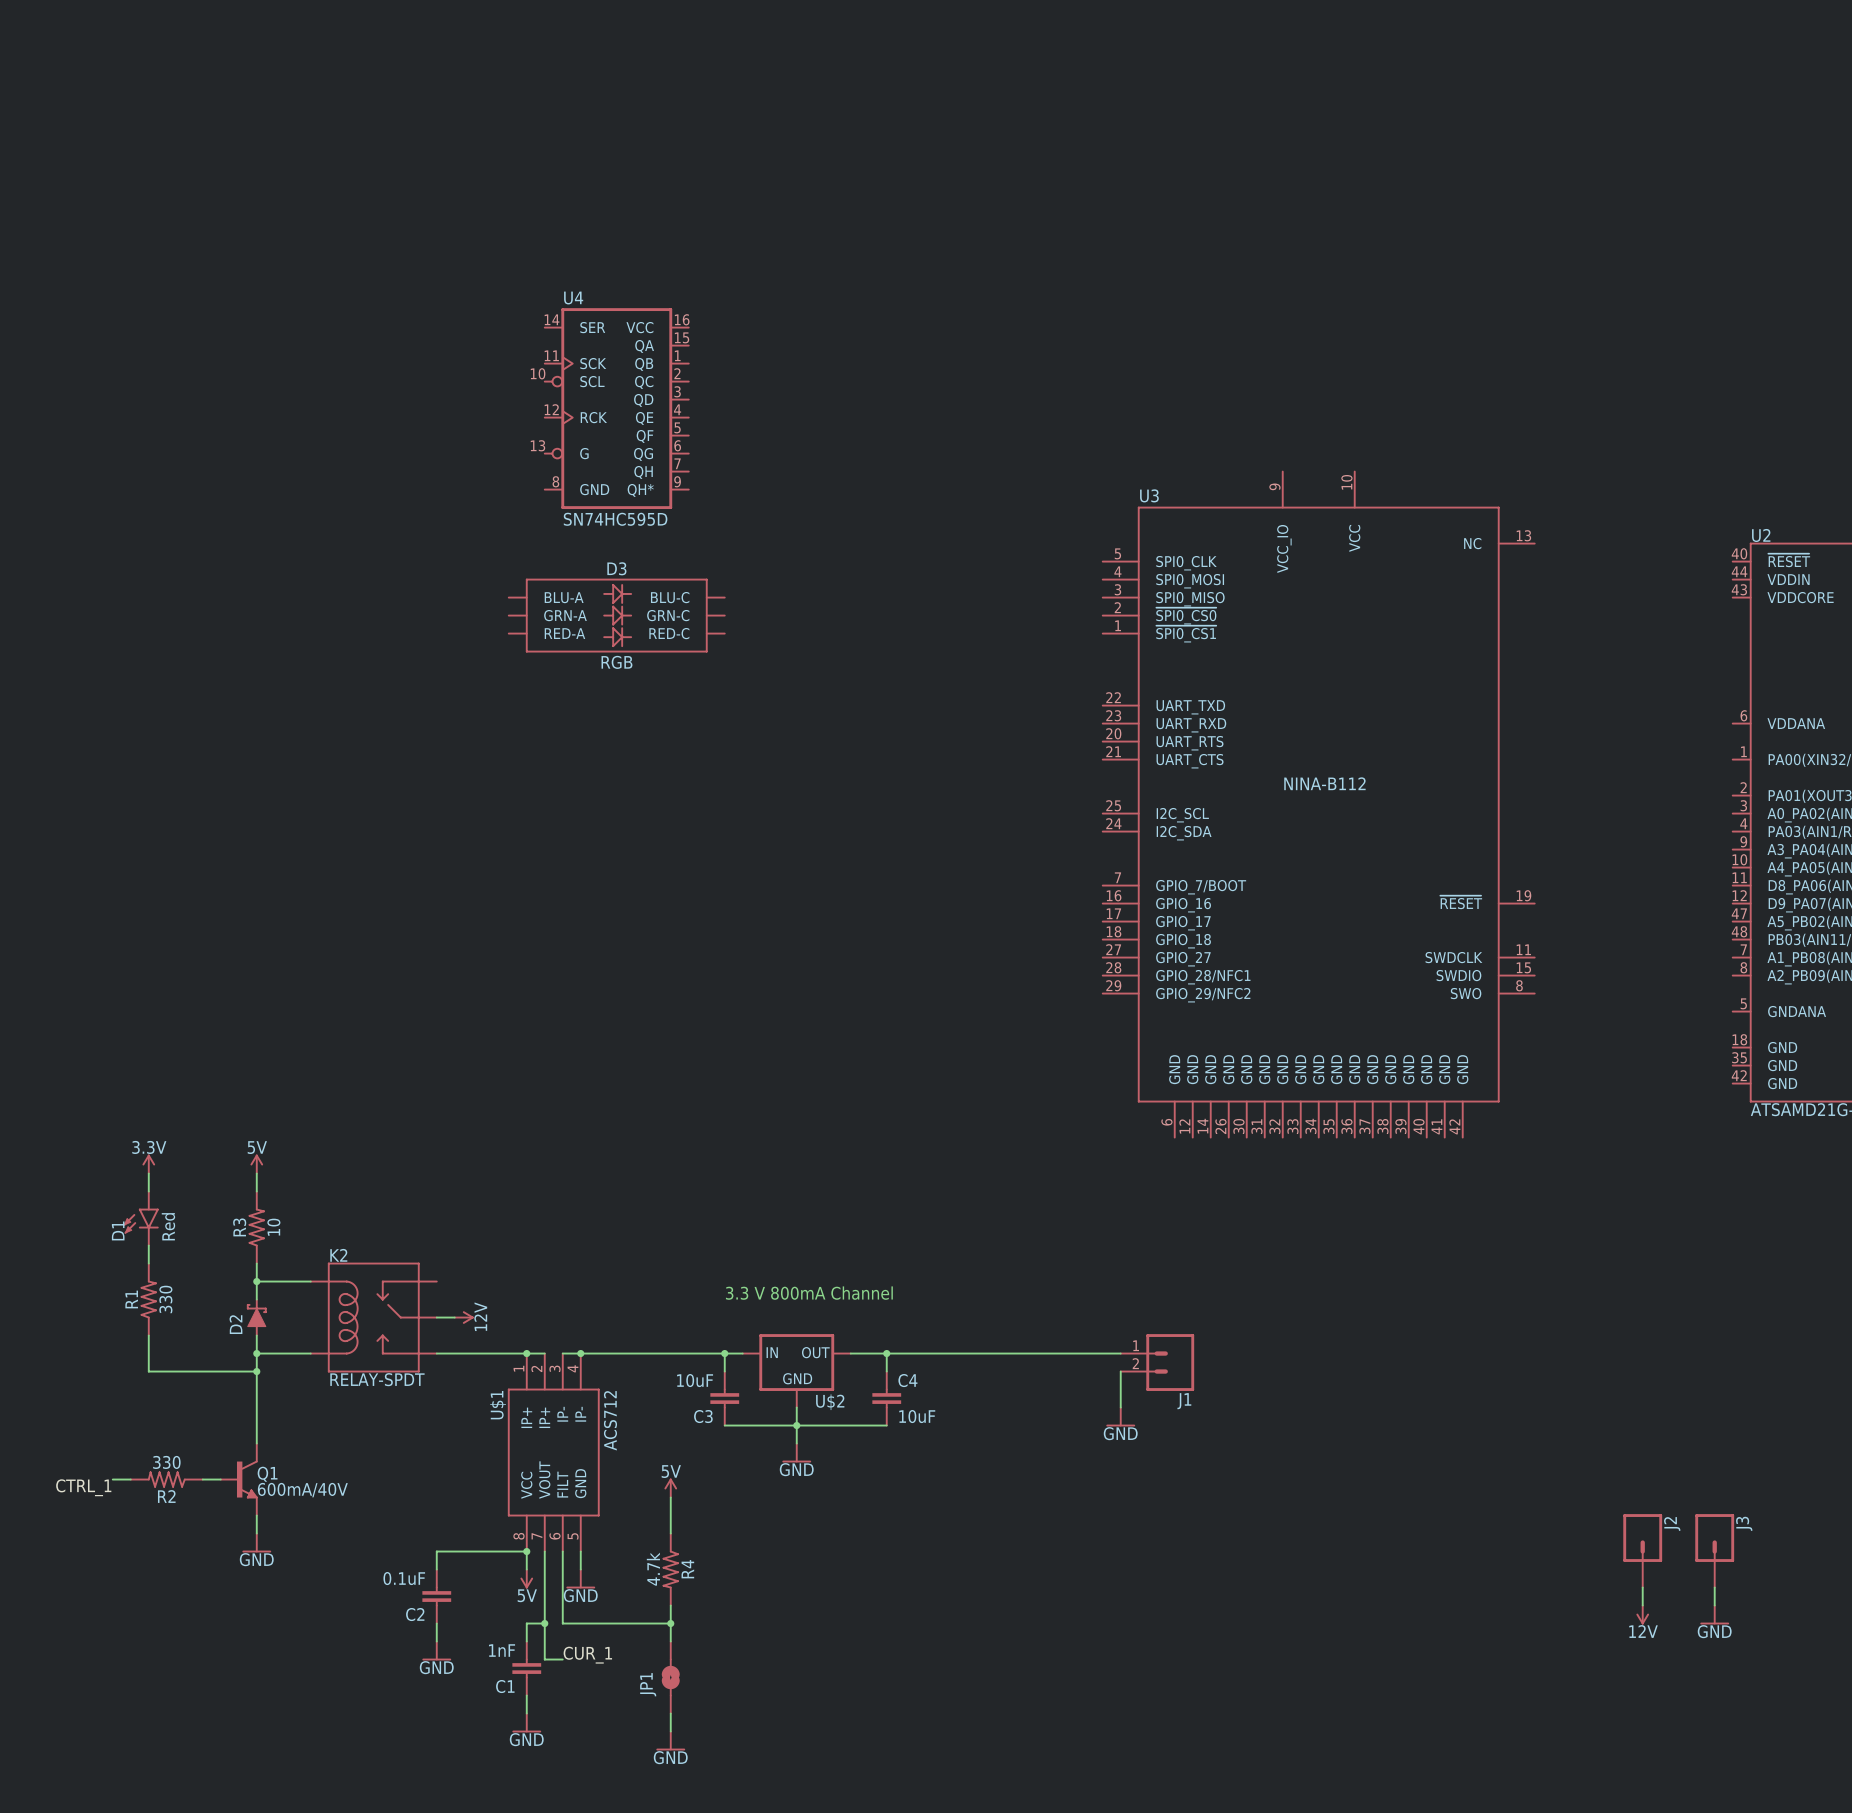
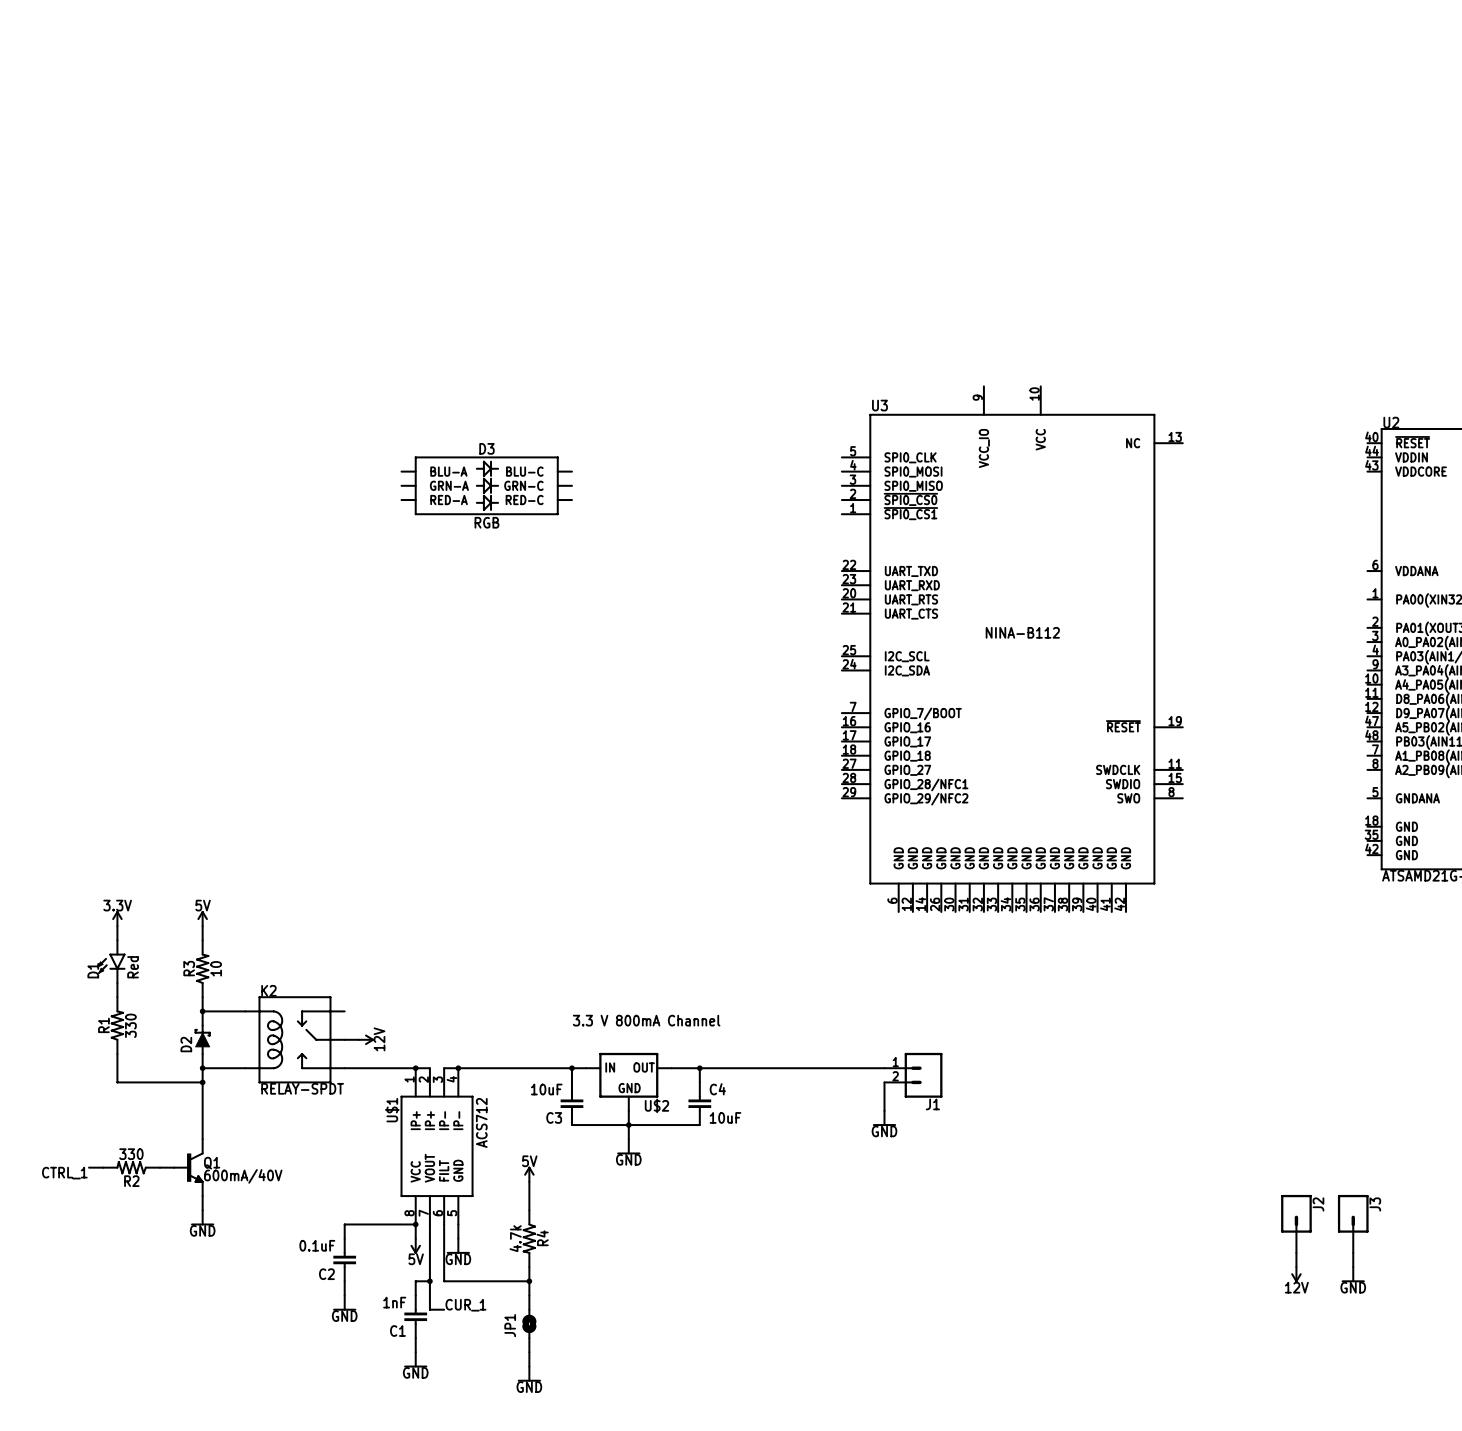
U4: SN74HC595D (616, 408) -> none
U3 position: (1318, 804) -> (1012, 649)

